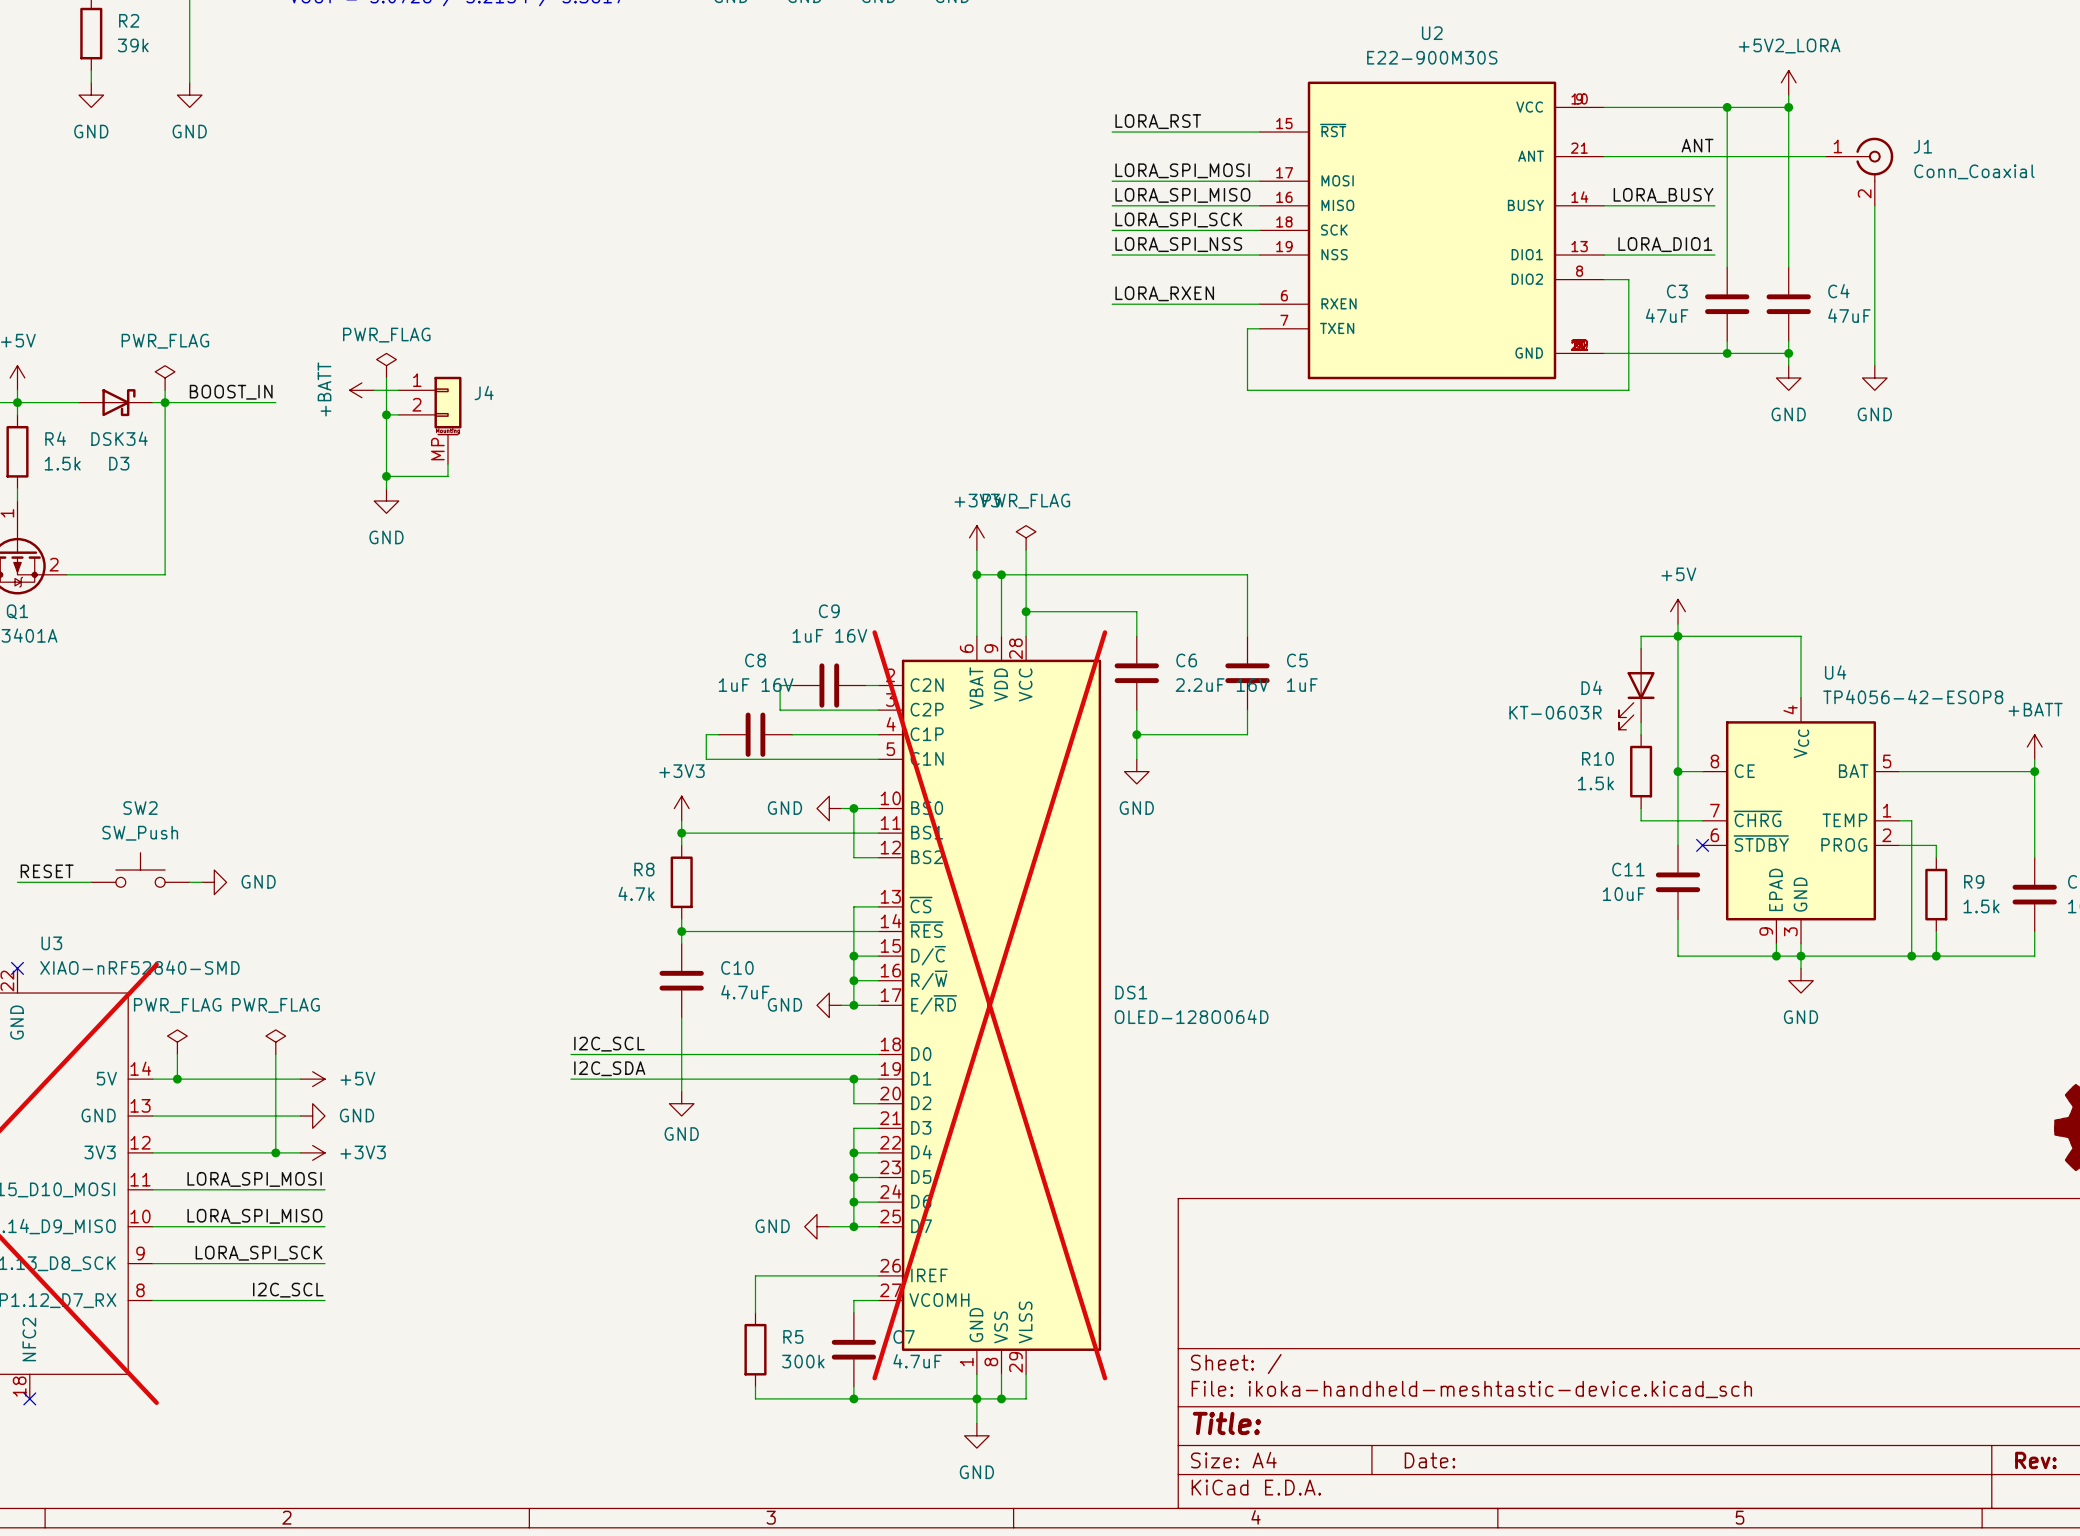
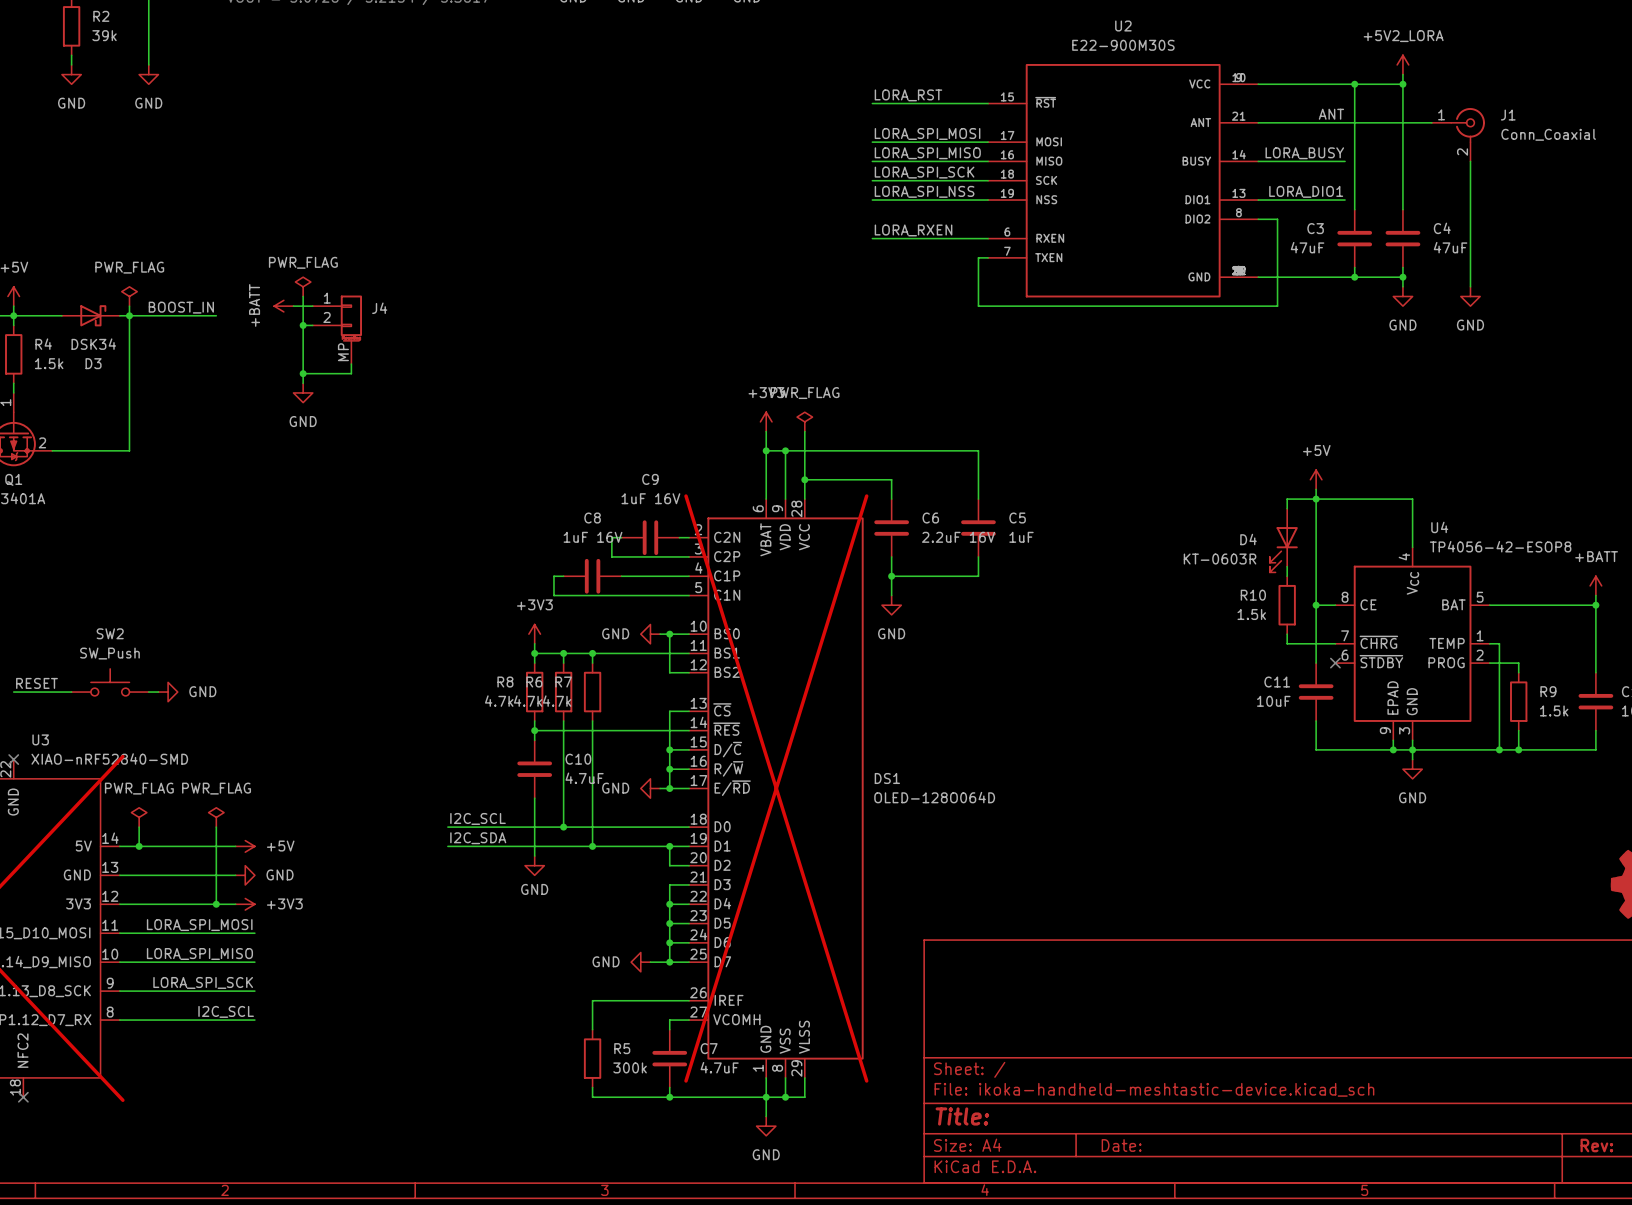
wire: none -> (563, 653) (563, 663)
junction: none -> (563, 653)
wire: none -> (592, 653) (592, 663)
junction: none -> (592, 653)
R6: none -> 4.7k (563, 692)
R7: none -> 4.7k (592, 692)
wire: none -> (563, 720) (563, 827)
wire: none -> (592, 720) (592, 846)
junction: none -> (563, 827)
junction: none -> (592, 846)

